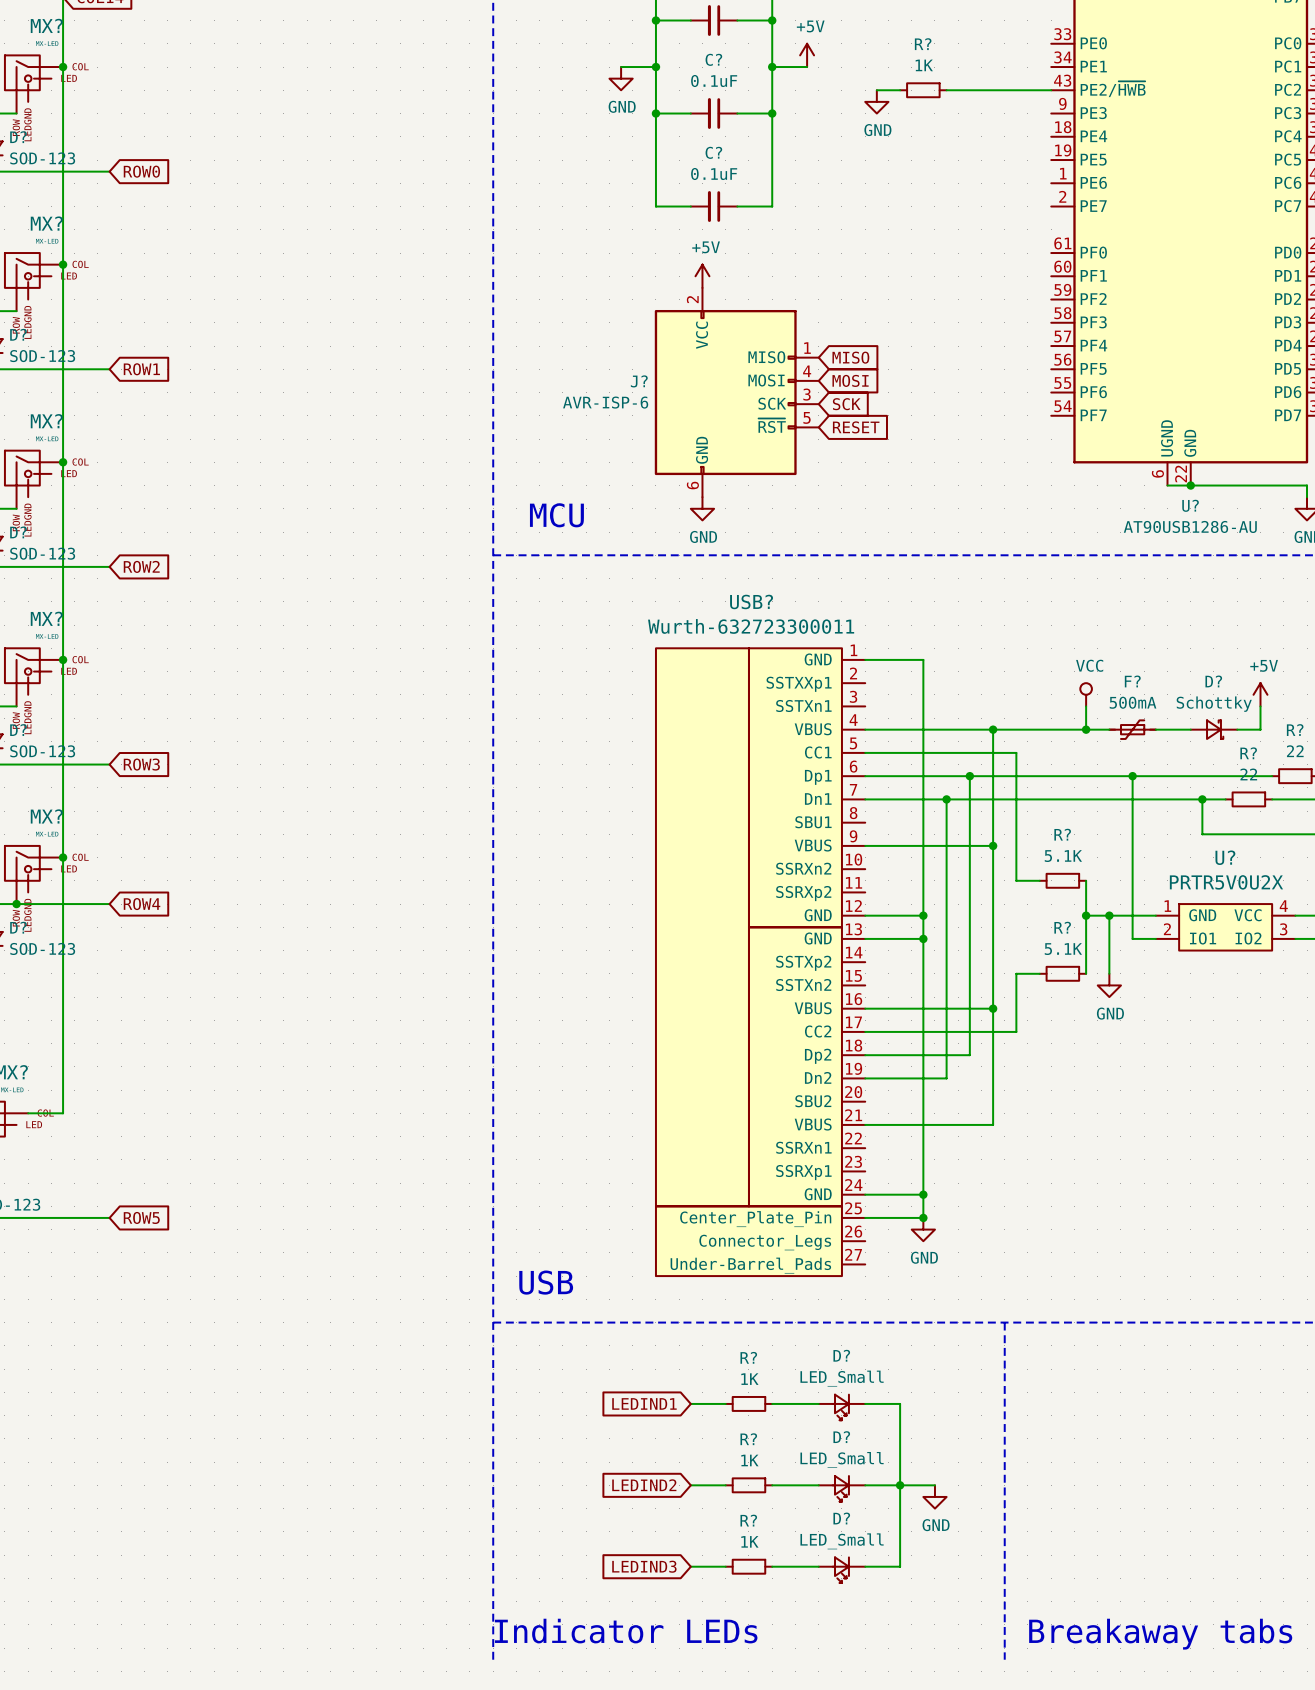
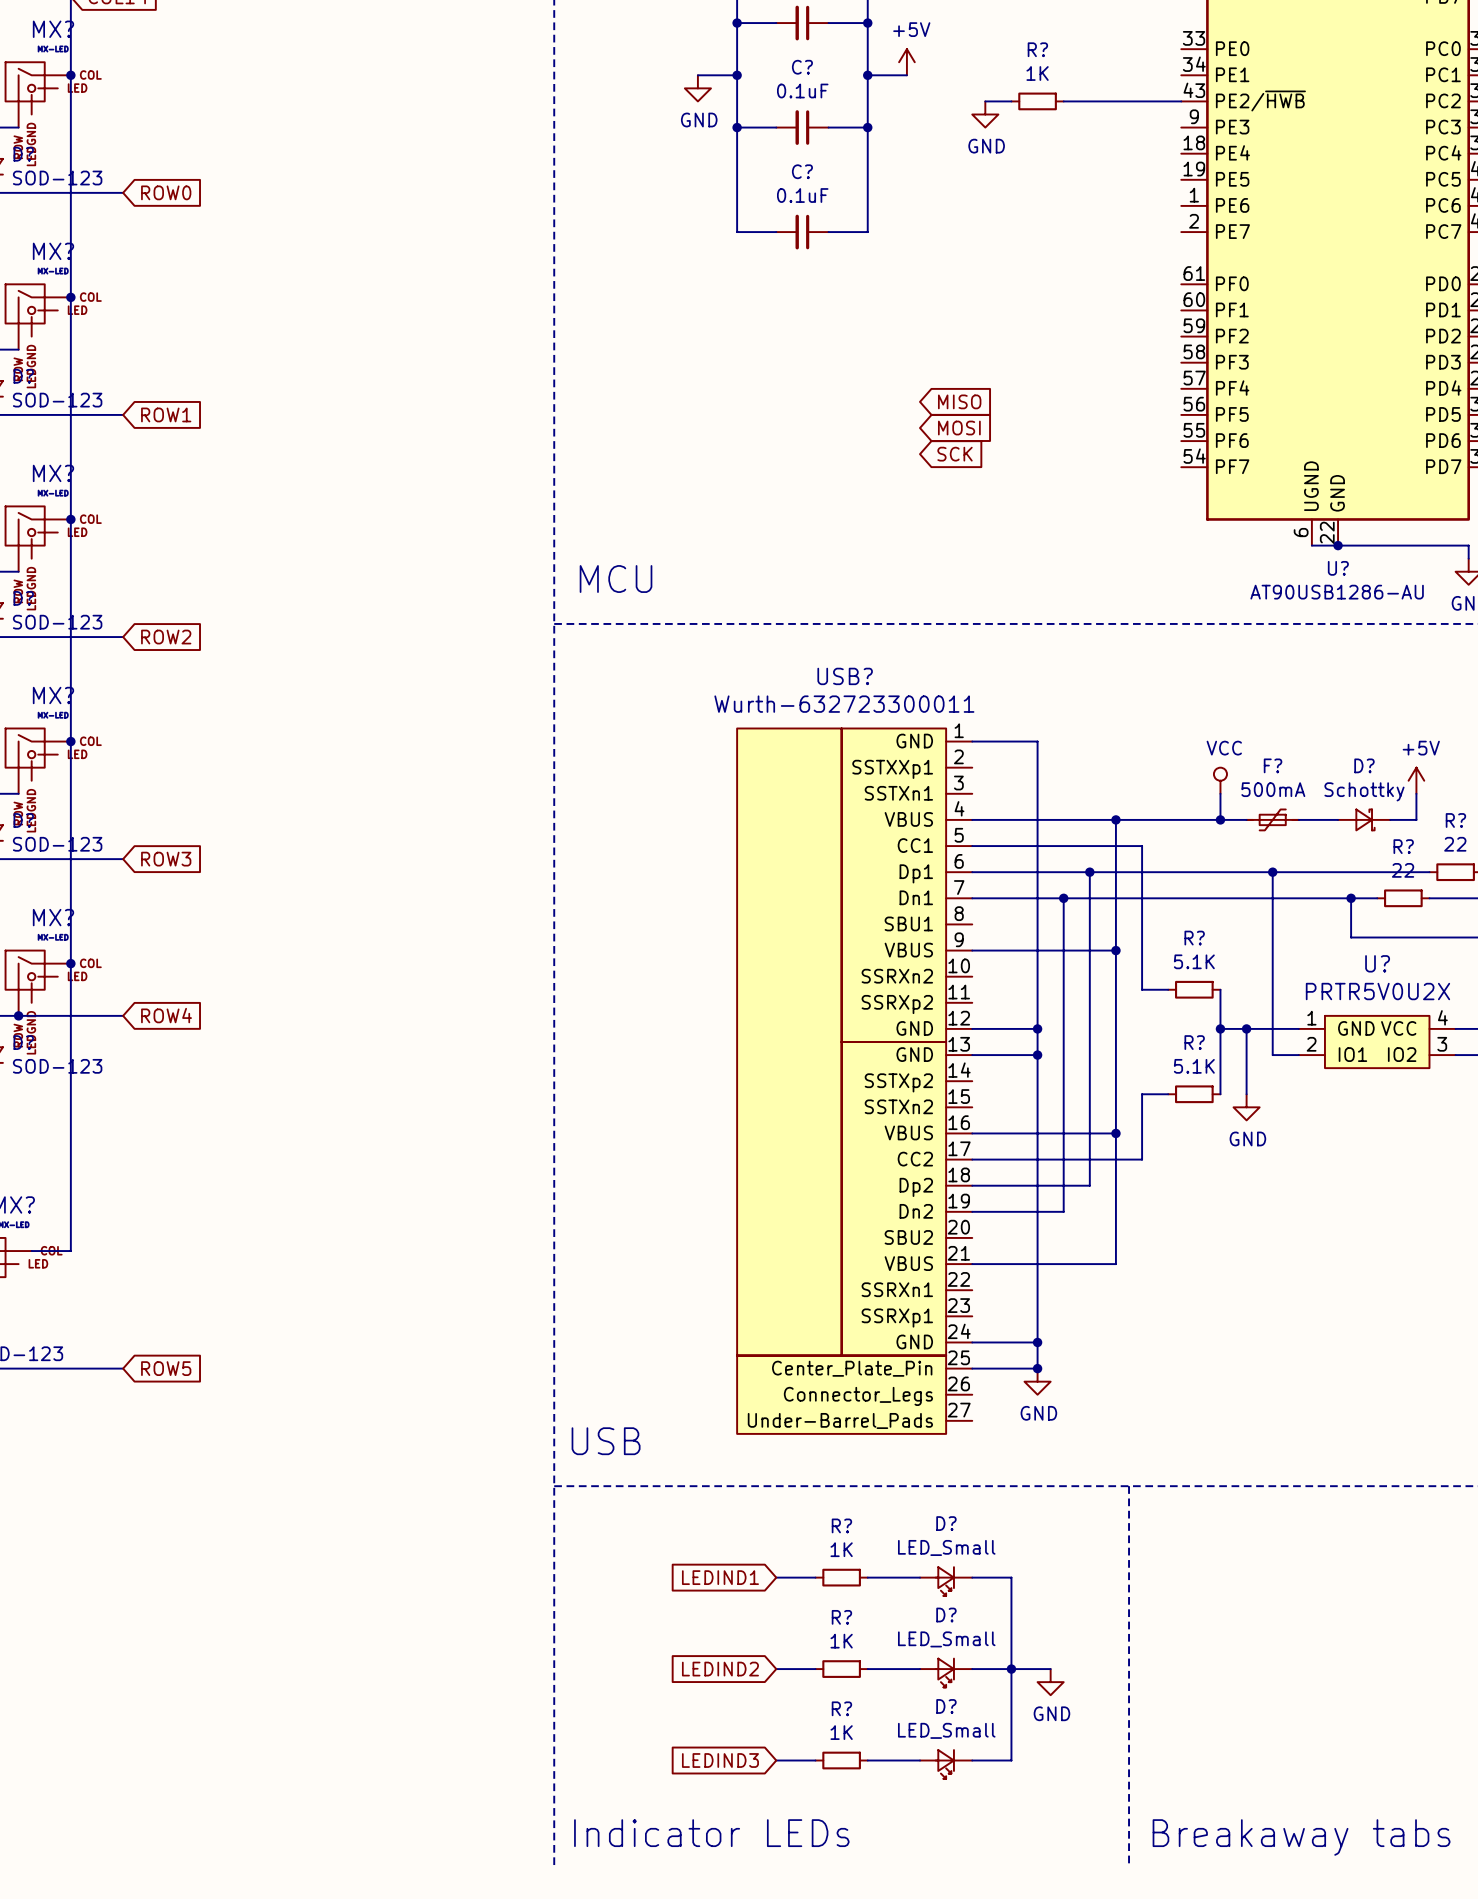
power symbol: +5V (702, 276) -> none
J?: AVR-ISP-6 (736, 392) -> none
global label: RESET (856, 427) -> none
power symbol: GND (702, 508) -> none

